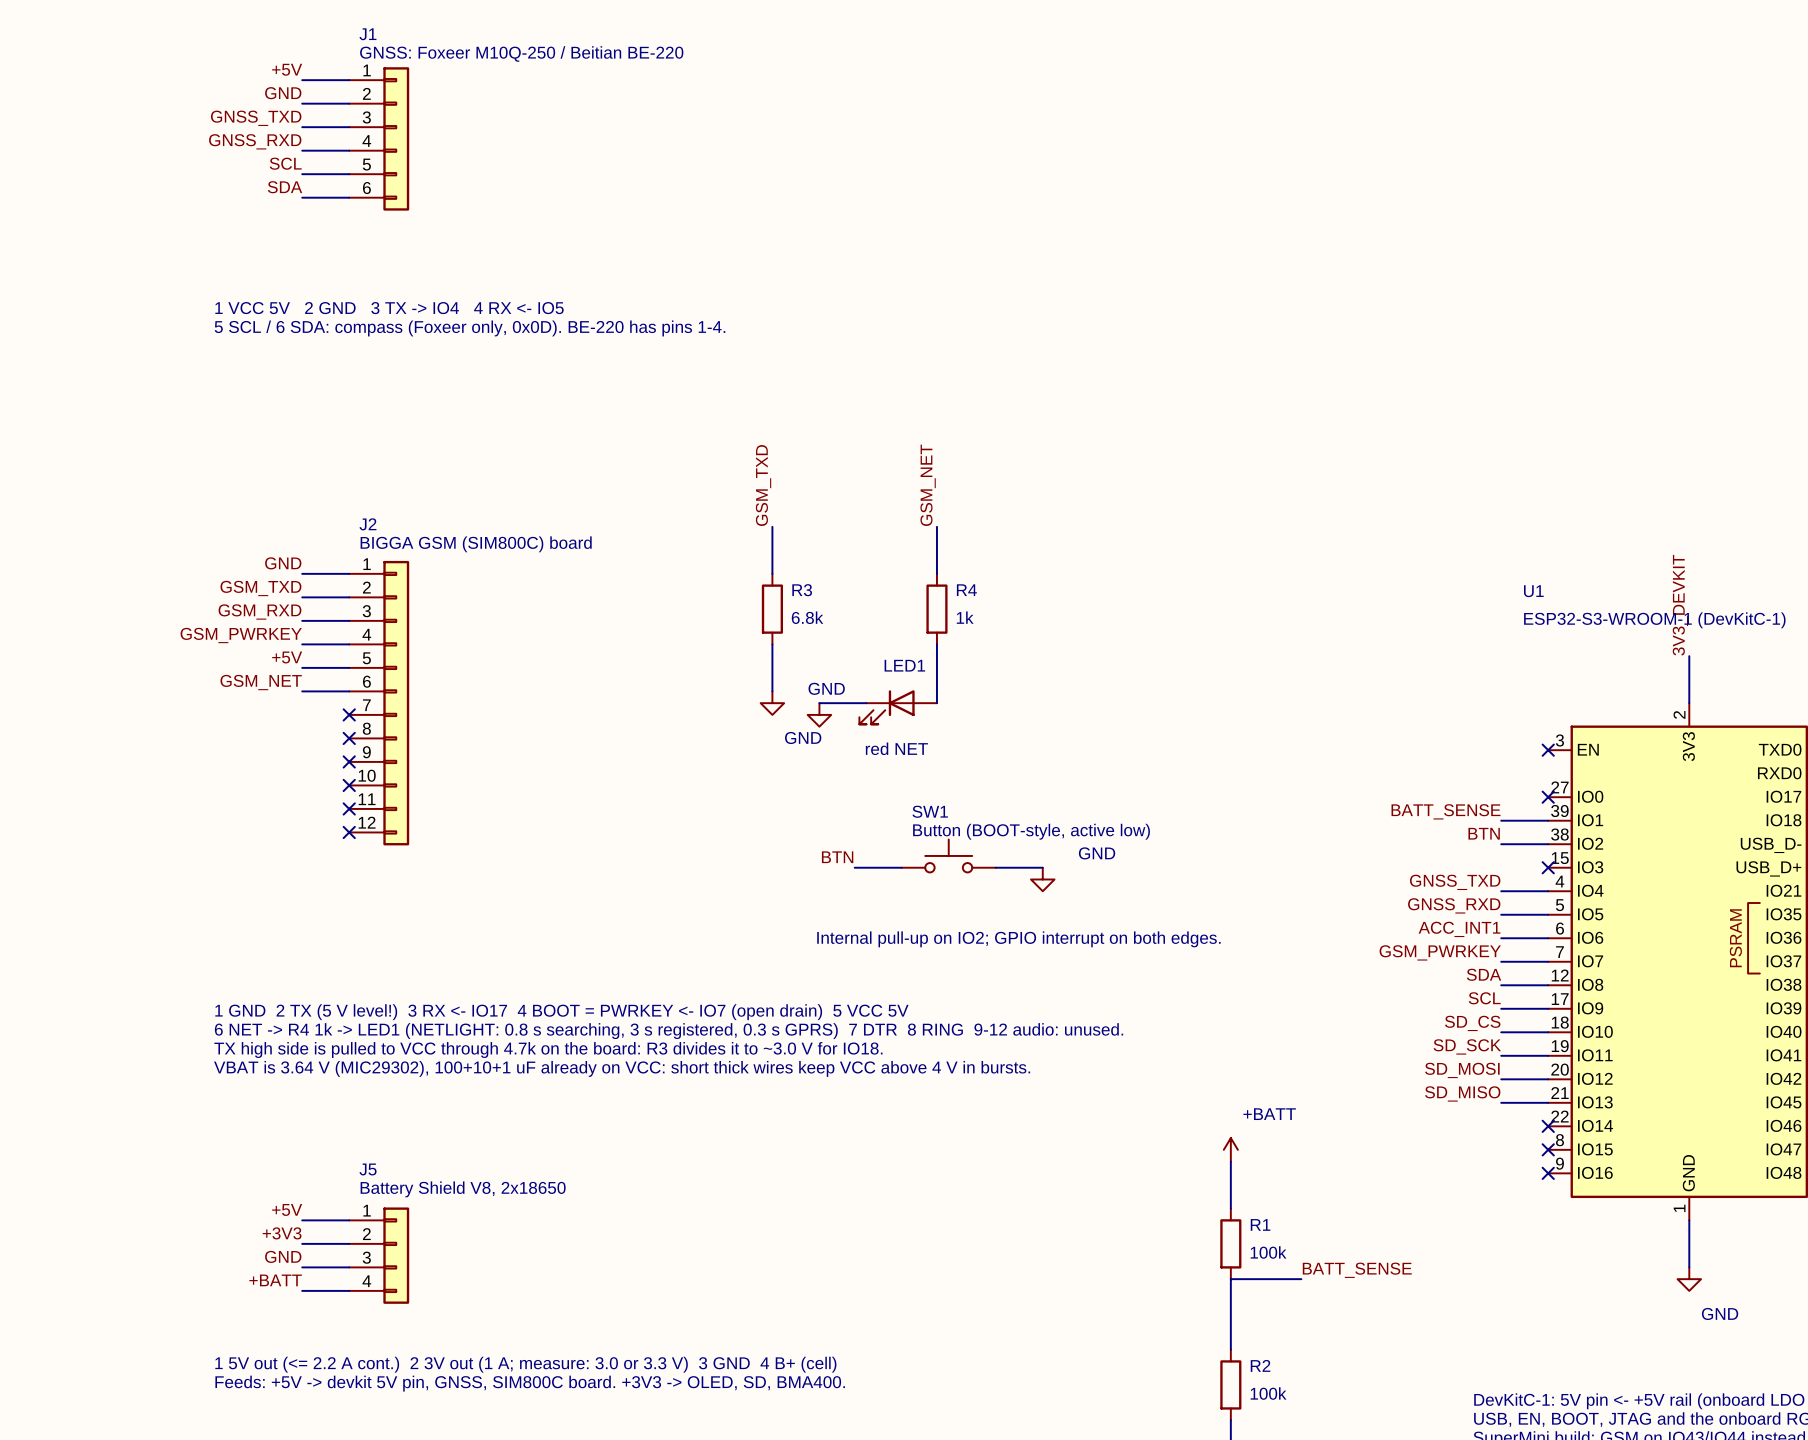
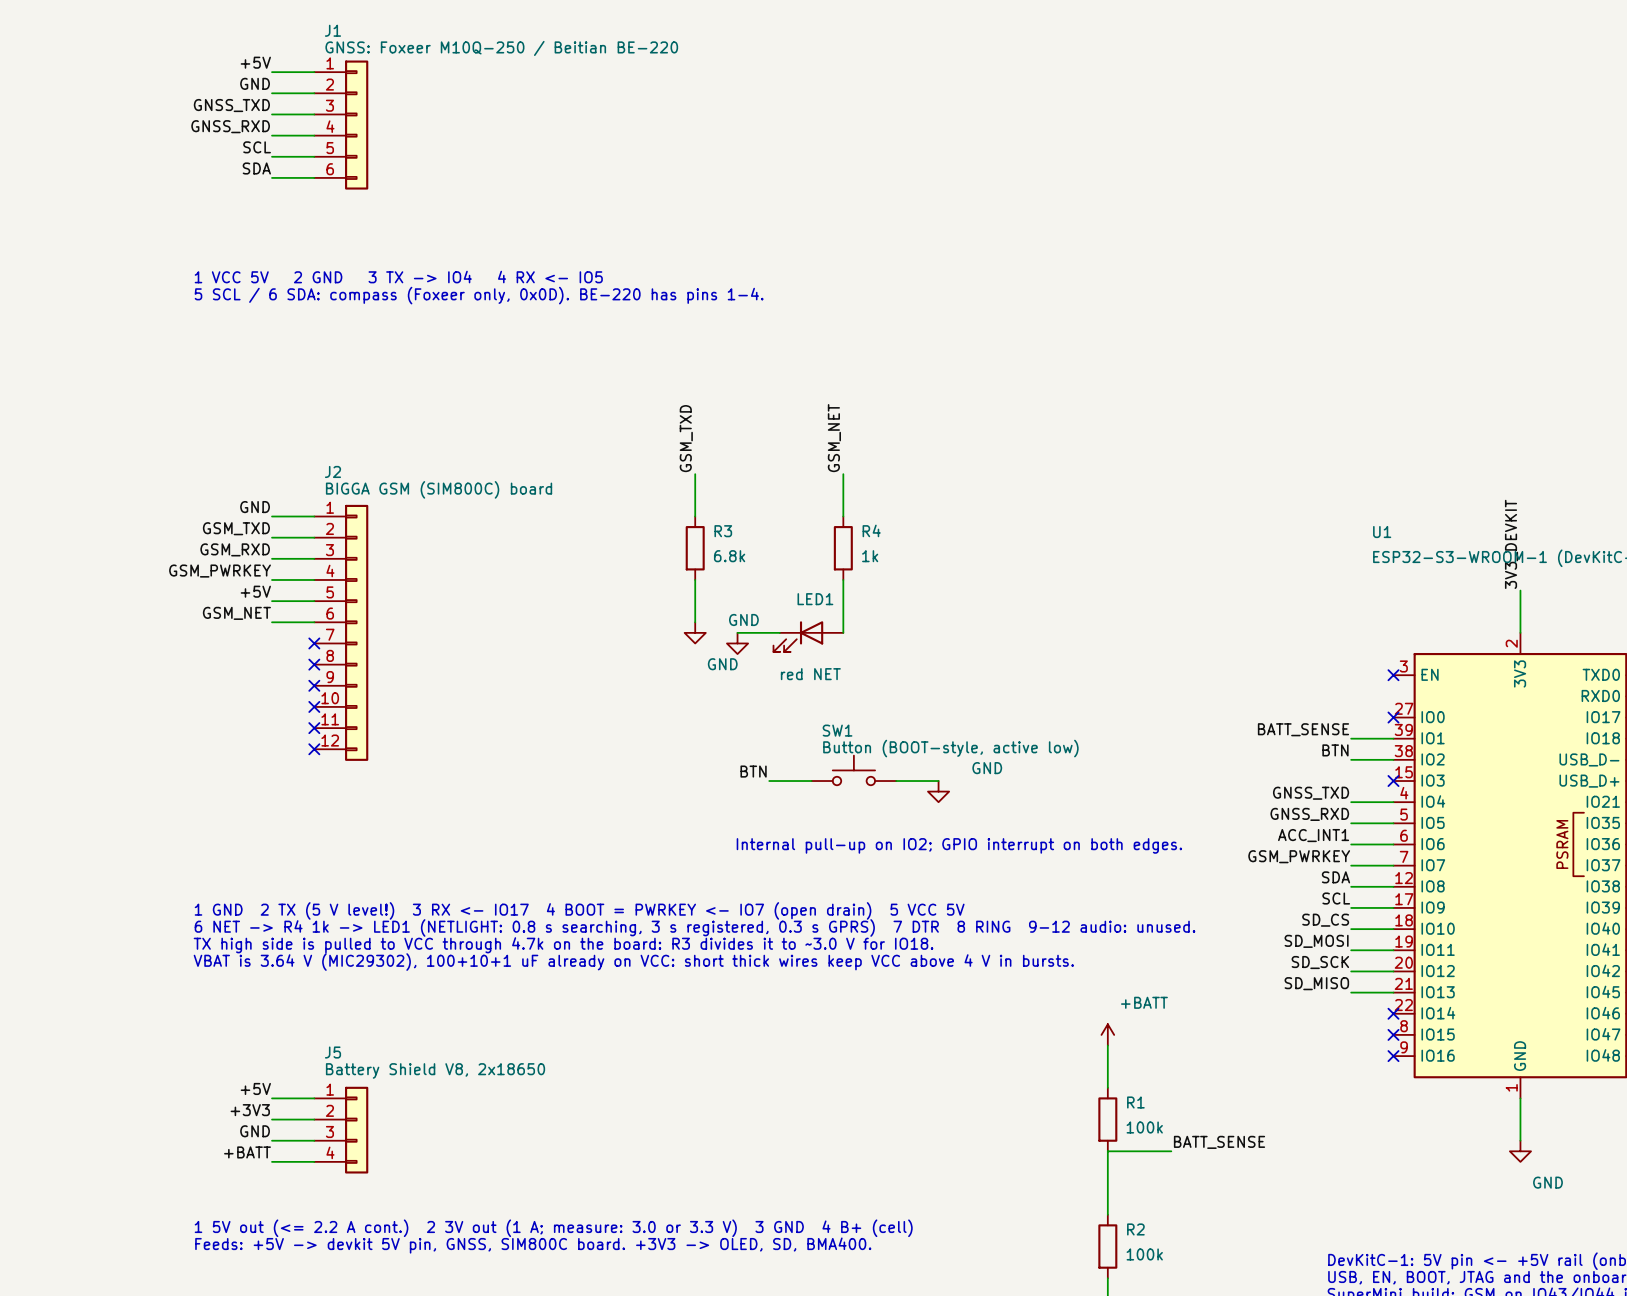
label: SD_SCK (1467, 1046) -> SD_MOSI (1316, 941)
label: SD_MOSI (1462, 1070) -> SD_SCK (1320, 962)

